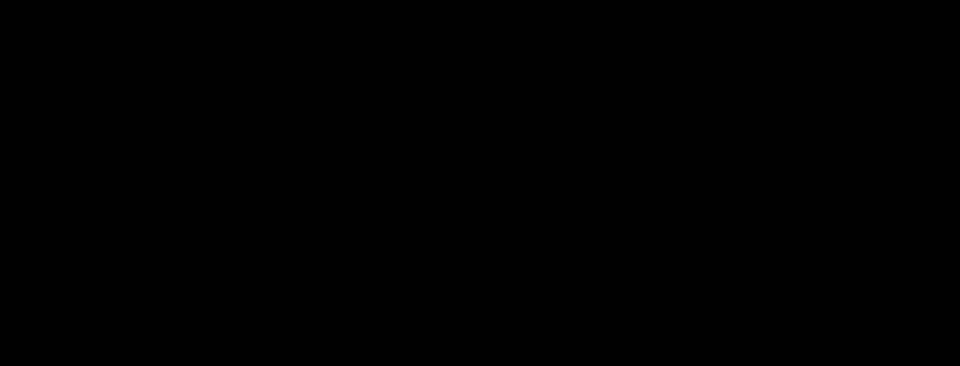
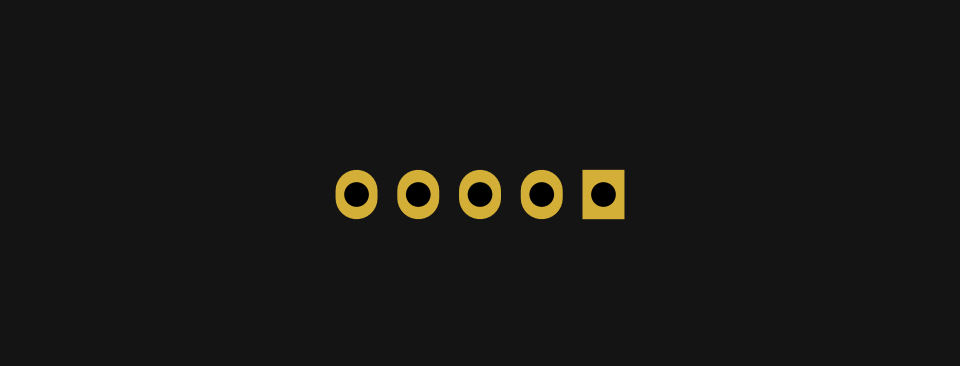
part: none -> (480, 194)

